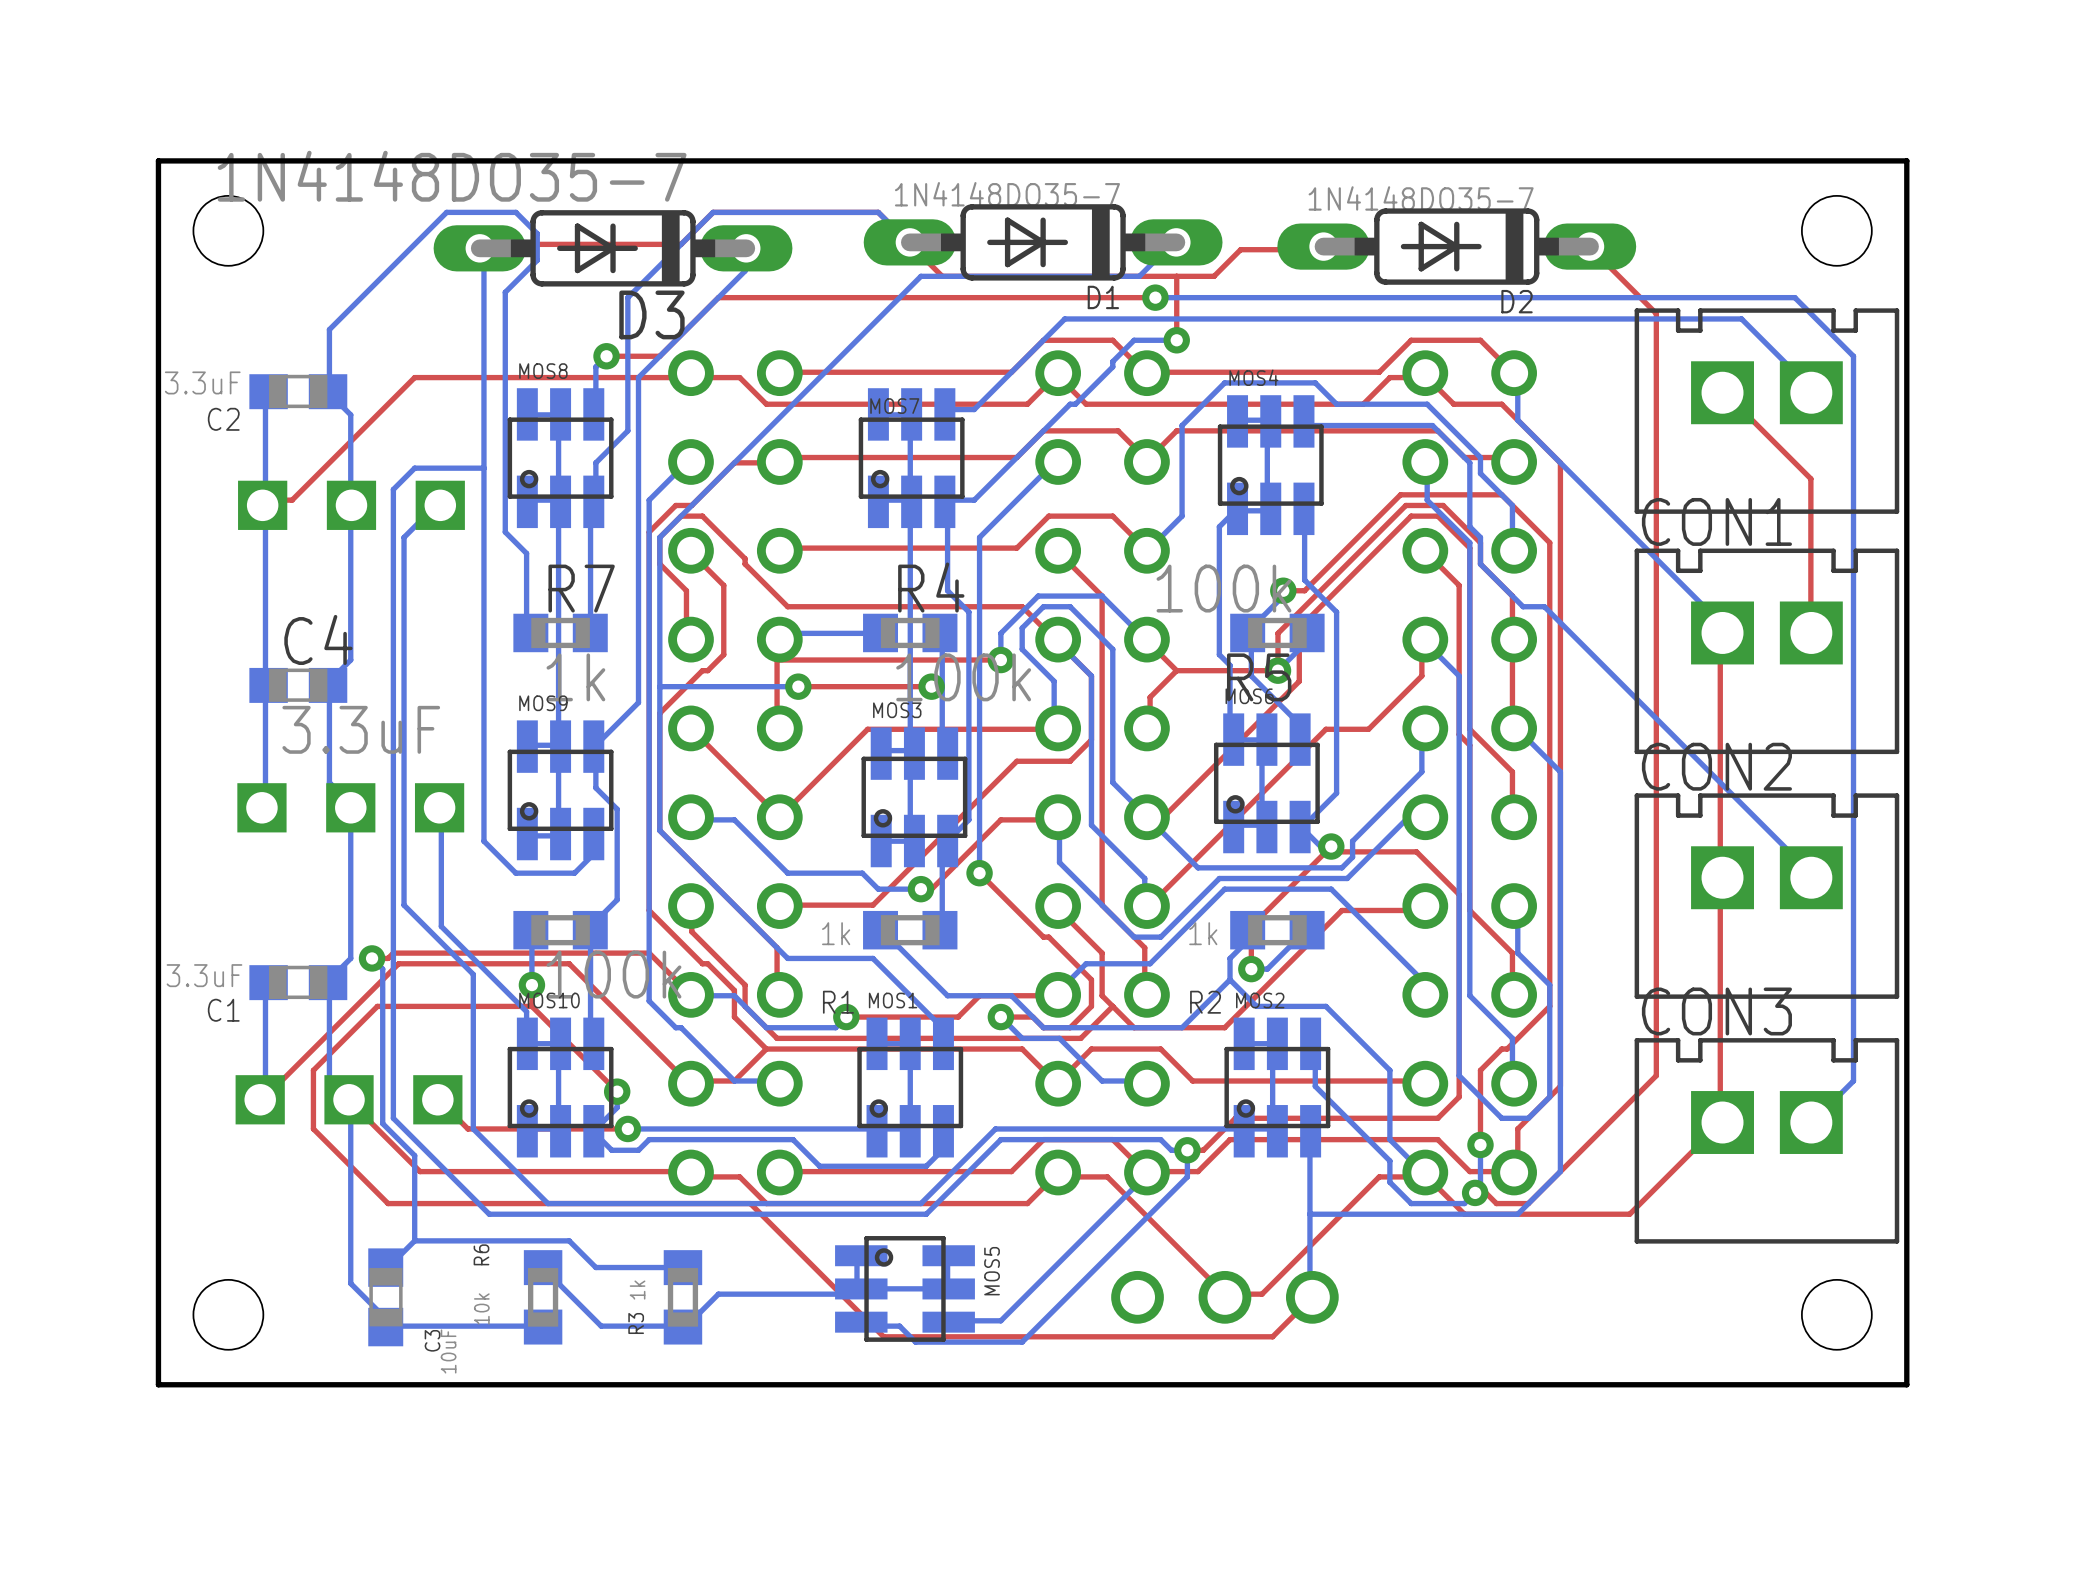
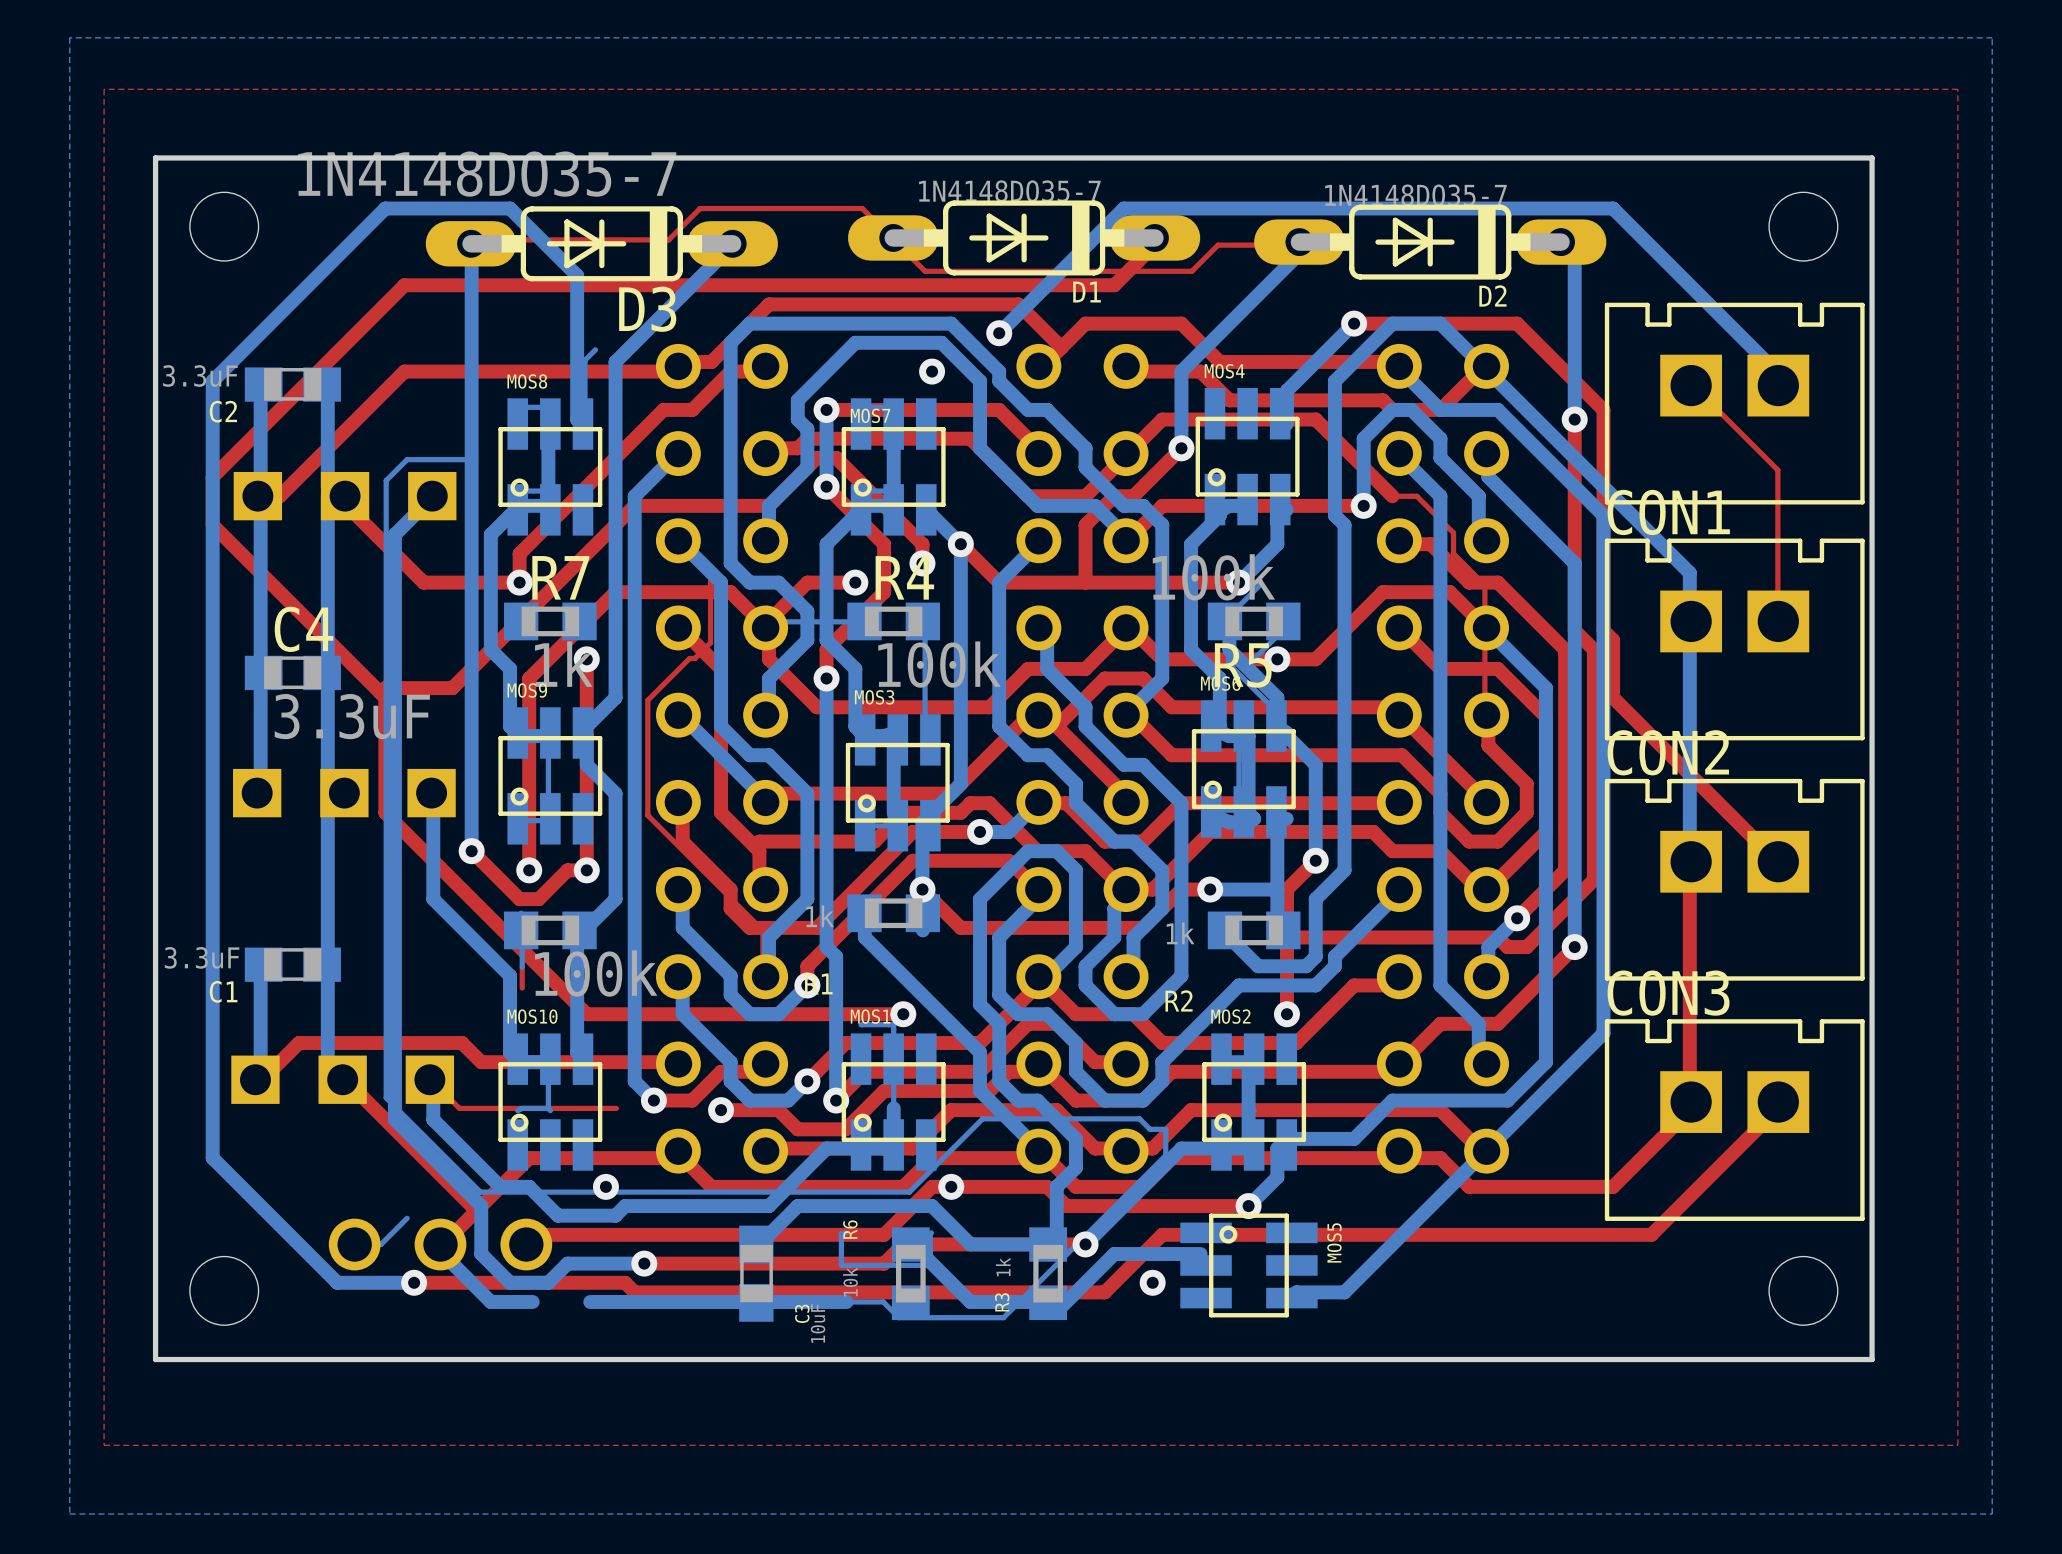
bottom zone outline: none -> (1992, 37) (69, 37) (69, 1514) (1992, 1514) (1992, 37)
top zone outline: none -> (1957, 89) (104, 89) (104, 1445) (1957, 1445) (1957, 89)
bottom track: (446, 212) (329, 329) (328, 391) (350, 414) (351, 505) (350, 660) (329, 681) (328, 685) (329, 782) (350, 803) (350, 958) (328, 982) (329, 1081) (350, 1102) (350, 1283) (382, 1315) (382, 1326) (385, 1327) (499, 1326) -> (438, 208) (385, 208) (212, 381) (212, 1158) (337, 1282) (414, 1282)
bottom track: (515, 212) (537, 233) (537, 260) (505, 292) (505, 532) (526, 553) (526, 628) (530, 632) -> (506, 208) (510, 208) (577, 275) (577, 419) (582, 424)
bottom track width: thin (515, 212) (446, 212) -> thick (506, 208) (438, 208)
bottom track: (909, 242) (878, 212) (713, 212) (627, 297) (627, 430) (595, 462) (595, 500) (590, 505) (590, 632) -> none
bottom track: (1176, 242) (1171, 244) (1139, 276) (920, 276) (659, 537) (659, 830) (787, 958) (872, 958) (942, 1027) (943, 1043) -> none
top track: (1590, 246) (1656, 313) (1656, 1075) (1528, 1203) (1496, 1203) (1485, 1192) (1475, 1192) -> none
bottom track: (479, 248) (483, 249) (483, 841) (515, 873) (574, 873) (590, 857) (590, 835) (593, 834) -> (471, 243) (471, 851)
bottom track: (746, 248) (745, 271) (638, 377) (638, 702) (593, 746) (595, 750) (595, 787) (617, 809) (617, 899) (590, 926) (590, 1043) (593, 1043) -> (732, 243) (615, 361) (615, 697) (586, 726) (582, 733) (586, 736) (586, 764) (615, 793) (615, 899) (586, 927) (579, 930) (577, 937) (577, 1052) (582, 1059)
top track: none -> (1161, 243) (1152, 246) (1114, 285) (404, 285) (212, 477) (212, 525) (385, 697) (385, 812) (586, 1014) (903, 1014)
bottom track: none -> (1312, 243) (1306, 246) (1181, 371) (1181, 448)
bottom track: none -> (1573, 243) (1574, 419)
top track: (1176, 276) (1176, 340) -> none
bottom track: (1155, 297) (1794, 297) (1853, 356) (1853, 1081) (1811, 1122) -> none
top track: (1155, 297) (718, 297) (659, 356) (606, 356) -> none
via: (1155, 297) -> none
bottom track: none -> (1354, 323) (1286, 390) (1286, 424)
top track: none -> (1354, 323) (1517, 323) (1603, 409) (1603, 630) (1613, 640) (1613, 697) (1778, 861)
via: none -> (1354, 323)
via: none -> (999, 333)
bottom track: (1176, 340) (1134, 340) (1112, 361) (1112, 366) (1075, 404) (1070, 404) (974, 500) (947, 500) (944, 501) (947, 505) (947, 590) (968, 612) (968, 819) (947, 841) -> none
via: (1176, 340) -> none
top track: none -> (1061, 347) (1018, 304) (769, 304) (711, 361) (682, 361) (673, 371) (404, 371) (279, 496) (260, 496) (257, 501)
via: (606, 356) -> none
top track: none -> (765, 366) (759, 371) (730, 371) (692, 409) (663, 409) (519, 553) (519, 582) (423, 582) (344, 501)
bottom track: none -> (1399, 366) (1402, 371) (1440, 409) (1497, 409) (1603, 515) (1603, 1033) (1344, 1292) (1296, 1292) (1291, 1298)
top track: none -> (1399, 366) (1392, 361) (1219, 361) (1181, 323) (1085, 323) (1047, 361) (1038, 366)
bottom track: (1514, 373) (1517, 377) (1517, 420) (1725, 628) (1722, 632) -> none
top track: (1514, 373) (1480, 340) (1411, 340) (1379, 372) (1146, 373) (1112, 340) (1043, 340) (1011, 372) (779, 373) -> (1486, 366) (1478, 371) (1440, 409) (1392, 409) (1382, 400) (1229, 400) (1200, 371) (1133, 371) (1126, 366)
via: none -> (932, 371)
bottom track: none -> (322, 384) (327, 390) (327, 486) (344, 501) (327, 496) (327, 668) (322, 672) (327, 678) (327, 774) (344, 793) (327, 784) (327, 956) (322, 964) (327, 966) (327, 1071) (337, 1081) (344, 1084)
bottom track: (1811, 392) (1810, 388) (1741, 318) (1064, 318) (974, 409) (947, 409) (944, 414) -> (1778, 385) (1785, 381) (1613, 208) (1123, 208) (999, 333)
bottom track width: thin (265, 398) (265, 500) -> thick (260, 390) (260, 491)
bottom track: none -> (826, 409) (826, 486)
top track: none -> (826, 409) (999, 409) (1037, 448) (1038, 453)
via: none -> (826, 409)
bottom track: (1237, 421) (1270, 421) (1267, 425) (1267, 505) (1270, 508) (1267, 510) (1240, 510) (1237, 508) (1219, 526) (1219, 654) (1230, 665) (1230, 734) (1235, 739) (1266, 739) -> none
bottom track: (1303, 421) (1304, 425) (1432, 425) (1469, 462) (1469, 526) (1480, 537) (1480, 564) (1523, 606) (1544, 606) (1810, 873) (1811, 877) -> none
top track: none -> (1574, 419) (1574, 630) (1593, 649) (1593, 879) (1526, 947) (1507, 947) (1497, 937) (1286, 937)
via: none -> (1574, 419)
bottom track width: thin (558, 437) (558, 500) -> thick (548, 429) (548, 491)
bottom track width: thin (910, 437) (910, 500) -> thick (893, 429) (893, 491)
top track: none -> (1181, 448) (1133, 496) (1114, 496) (1085, 525) (1085, 582)
via: none -> (1181, 448)
MOS8 position: (560, 458) -> (550, 466)
MOS7 position: (911, 458) -> (893, 466)
bottom track: (691, 461) (686, 462) (649, 500) (649, 1001) (675, 1027) (681, 1027) (734, 1081) (777, 1081) (779, 1083) -> (678, 453) (634, 496) (634, 1081) (653, 1100)
top track: none -> (765, 453) (769, 448) (797, 448) (807, 438) (970, 438) (1027, 496) (1085, 496) (1126, 453) (1162, 419) (1315, 419) (1392, 496)
bottom track: (1058, 461) (1054, 462) (979, 537) (979, 873) -> none
bottom track: (1425, 461) (1427, 462) (1427, 500) (1469, 542) (1469, 995) (1512, 1038) (1512, 1081) (1514, 1083) -> (1399, 453) (1440, 496) (1440, 985) (1478, 1023) (1478, 1062) (1486, 1063)
bottom track: none -> (1486, 453) (1488, 457) (1488, 477) (1574, 563) (1574, 947)
top track: (1514, 461) (1512, 457) (1464, 457) (1437, 430) (1176, 430) (1146, 461) (1118, 430) (1043, 430) (1016, 457) (782, 457) (777, 462) (734, 462) (691, 505) (675, 505) (649, 532) (649, 910) (702, 963) (707, 963) (734, 990) (734, 1017) (766, 1049) -> none
top track: none -> (826, 486) (884, 544) (884, 592) (826, 649) (826, 678)
via: none -> (826, 486)
top track: (262, 505) (265, 500) (292, 500) (414, 377) (686, 377) (691, 373) (691, 377) (739, 377) (766, 404) (1027, 404) (1058, 373) (1059, 377) (1086, 404) (1363, 404) (1389, 377) (1421, 377) (1425, 373) (1427, 377) (1453, 404) (1501, 404) (1560, 462) (1560, 1086) (1517, 1128) (1517, 1171) (1469, 1171) (1437, 1139) (1230, 1139) (1198, 1171) (1146, 1172) (1112, 1139) (1043, 1139) (1011, 1171) (779, 1172) -> (1486, 1151) (1478, 1148) (1440, 1110) (1191, 1110) (1152, 1148) (1133, 1148) (1126, 1151) (1123, 1148) (1095, 1148) (1056, 1110) (951, 1110) (912, 1148) (769, 1148) (765, 1151)
bottom track: (440, 505) (436, 505) (404, 537) (404, 905) (473, 974) (473, 1128) (547, 1203) (920, 1203) (995, 1128) (1240, 1128) (1244, 1131) (1246, 1128) (1272, 1128) (1272, 1049) (1277, 1043) (1244, 1043) -> none
top track: (1418, 505) (1405, 505) (1277, 633) (1277, 670) (1176, 670) (1150, 697) (1150, 723) (1146, 728) -> (1486, 715) (1488, 716) (1488, 745) (1526, 784) (1526, 812) (1497, 841) (1469, 841) (1440, 812) (1440, 793) (1402, 755) (1171, 755) (1133, 716) (1126, 715)
bottom track: (1303, 508) (1304, 580) (1336, 612) (1336, 793) (1304, 825) (1300, 827) (1320, 846) (1331, 846) -> none
bottom track: none -> (431, 501) (423, 505) (394, 534) (394, 1119) (481, 1206) (481, 1254) (510, 1282) (548, 1282) (567, 1263) (644, 1263)
bottom track width: thin (265, 515) (265, 681) (268, 685) -> thick (260, 505) (260, 668) (263, 672)
bottom track: (558, 515) (558, 745) -> none
bottom track: (910, 515) (910, 749) -> (893, 505) (893, 509) (884, 505) (864, 505) (826, 544) (826, 640) (855, 668) (855, 726) (864, 736) (884, 736) (893, 733) (893, 736)
bottom track: none -> (1248, 505) (1229, 505) (1221, 509) (1219, 515) (1191, 544) (1191, 649) (1219, 678) (1221, 733) (1229, 736) (1248, 736) (1248, 812) (1254, 818) (1248, 822) (1229, 822) (1221, 818)
via: none -> (1363, 505)
bottom track: none -> (550, 509) (548, 505) (519, 505) (517, 509) (490, 534) (490, 649) (510, 668) (510, 726) (519, 736) (548, 736)
bottom track: none -> (926, 509) (960, 544) (960, 784) (922, 822) (922, 930)
bottom track: none -> (1286, 509) (1277, 515) (1277, 544) (1239, 582)
bottom track: none -> (678, 540) (721, 582) (721, 726) (749, 755) (769, 755) (807, 793) (807, 899) (769, 937) (769, 975) (765, 976)
bottom track: none -> (1038, 540) (999, 582) (999, 726) (1027, 755) (1047, 755) (1075, 784) (1075, 803) (1114, 841) (1133, 841) (1162, 870) (1162, 908) (1133, 937) (1133, 975) (1126, 976)
top track: (1058, 550) (1102, 596) (1102, 905) (1144, 947) (1144, 990) (1146, 994) -> none
bottom track: none -> (1126, 540) (1123, 534) (1095, 505) (1037, 505) (980, 448) (980, 381) (941, 342) (855, 342) (797, 400) (797, 419) (807, 429) (807, 467) (769, 505) (769, 534) (765, 540)
top track: (1146, 550) (1112, 516) (1048, 516) (1016, 548) (782, 548) (779, 550) -> (1126, 540) (1162, 505) (1363, 505)
top track: (1425, 550) (1459, 585) (1459, 734) (1469, 745) (1469, 910) (1512, 953) (1514, 994) -> (1399, 540) (1402, 544) (1430, 544) (1469, 582) (1497, 582) (1565, 649) (1565, 870) (1517, 918)
bottom track: (1514, 550) (1512, 548) (1512, 505) (1480, 473) (1480, 457) (1427, 404) (1336, 404) (1315, 382) (1224, 382) (1182, 425) (1182, 516) (1146, 550) -> (1486, 540) (1478, 534) (1478, 496) (1440, 457) (1440, 438) (1411, 409) (1392, 409) (1363, 438) (1363, 505)
top track: none -> (960, 544) (999, 582) (1239, 582)
via: none -> (960, 544)
top track: none -> (922, 563) (922, 544) (836, 457) (816, 457) (769, 505) (634, 505) (452, 688) (385, 688) (380, 692)
via: none -> (922, 563)
top track: (1283, 590) (1304, 590) (1400, 494) (1501, 494) (1549, 542) (1549, 1006) (1507, 1049) (1501, 1049) (1480, 1070) (1480, 1144) -> none
via position: (1283, 590) -> (1239, 582)
via: none -> (519, 582)
top track: none -> (855, 582) (807, 582) (769, 620) (765, 627)
via: none -> (855, 582)
bottom track: none -> (1224, 621) (1229, 630) (1229, 649) (1277, 697) (1277, 726) (1286, 733) (1286, 736) (1315, 764) (1315, 860)
top track: (1722, 632) (1720, 633) (1720, 873) (1722, 877) (1720, 878) (1720, 1118) (1722, 1122) (1629, 1214) (1464, 1214) (1427, 1176) (1425, 1172) (1421, 1176) (1379, 1176) (1261, 1294) (1230, 1294) (1224, 1297) (1224, 1294) (1107, 1176) (1059, 1176) (1058, 1172) (1027, 1203) (766, 1203) (739, 1176) (691, 1176) (691, 1172) (686, 1171) (420, 1171) (349, 1099) -> none
top track: (691, 639) (686, 638) (686, 590) (659, 564) (659, 537) (681, 516) (702, 516) (745, 558) (745, 564) (787, 606) (1022, 606) (1054, 638) (1058, 639) (1059, 644) (1091, 676) (1091, 739) (1070, 761) (1016, 761) (872, 905) (779, 906) -> (678, 627) (721, 668) (721, 812) (759, 851) (759, 889) (765, 889)
top track: none -> (765, 627) (730, 592) (615, 592) (529, 678) (529, 870)
bottom track: (1058, 639) (1059, 644) (1091, 676) (1091, 825) (1144, 878) (1144, 905) (1146, 906) -> (1038, 627) (1047, 630) (1047, 668) (1085, 707) (1085, 726) (1123, 764) (1143, 764) (1181, 803) (1181, 975) (1143, 1014) (1114, 1014) (1085, 985) (1085, 966) (1114, 937) (1114, 908) (1123, 899) (1126, 889)
bottom track: (1146, 639) (1102, 596) (1038, 596) (1000, 633) (1000, 660) -> none
bottom track: (1425, 639) (1427, 644) (1459, 676) (1459, 1075) (1501, 1118) (1528, 1118) (1549, 1096) (1549, 985) (1517, 953) (1517, 910) (1514, 906) -> none
top track: (1425, 639) (1421, 644) (1421, 676) (1368, 729) (1325, 729) (1150, 905) (1146, 906) -> (1399, 627) (1440, 668) (1497, 668) (1545, 716) (1545, 831) (1488, 889) (1478, 889) (1440, 851) (1392, 851) (1373, 831) (1210, 831) (1152, 889) (1123, 889) (1085, 851) (1037, 851) (989, 803) (970, 803) (960, 812) (903, 812) (874, 841) (759, 841) (754, 846)
bottom track: none -> (1486, 627) (1545, 688) (1545, 1062) (1507, 1100) (1392, 1100) (1354, 1138) (1286, 1138) (1286, 1144) (1277, 1148) (1277, 1177) (1248, 1206)
top track: none -> (1486, 627) (1450, 592) (1382, 592) (1315, 659) (1162, 659) (1133, 630) (1126, 627) (1085, 668) (1027, 668) (989, 707) (816, 707) (769, 659) (769, 630) (765, 627)
top track: (1000, 660) (777, 660) (779, 639) (777, 644) (777, 723) -> none
via: (1000, 660) -> none
via position: (1277, 670) -> (1277, 659)
top track: none -> (586, 659) (586, 870) (567, 870) (538, 899) (519, 899) (471, 851)
via: none -> (586, 659)
bottom track: (798, 686) (659, 686) -> none
via position: (798, 686) -> (826, 678)
top track: (931, 686) (798, 686) -> none
via: (931, 686) -> none
bottom track width: thin (265, 691) (265, 798) -> thick (260, 678) (260, 784)
bottom track: none -> (826, 678) (826, 947) (836, 956) (836, 1100)
bottom track: none -> (678, 715) (682, 716) (759, 793) (765, 802)
top track: (1058, 728) (867, 729) (779, 817) (691, 728) -> (1038, 715) (1037, 707) (951, 793) (769, 793) (765, 802)
top track: none -> (1038, 715) (1047, 716) (1123, 793) (1126, 802)
bottom track: none -> (1126, 715) (1162, 678) (1162, 525) (1143, 505) (1123, 505) (1085, 467) (1085, 448) (1047, 409) (1027, 409) (999, 381) (999, 371) (951, 323) (749, 323) (730, 342) (730, 563) (749, 582) (778, 582) (807, 611) (807, 640) (769, 678) (769, 707) (765, 715)
bottom track: (1425, 728) (1421, 729) (1421, 771) (1352, 841) (1352, 857) (1341, 867) (1198, 867) (1112, 782) (1112, 649) (1070, 606) (1043, 606) (1022, 628) (1022, 649) (1054, 681) (1054, 723) (1058, 728) -> none
bottom track: (1514, 728) (1517, 729) (1560, 771) (1560, 1171) (1517, 1214) (1309, 1214) -> none
bottom track width: thin (910, 755) (910, 827) -> thick (893, 742) (893, 812)
bottom track width: thin (441, 809) (441, 915) -> thick (433, 794) (433, 899)
bottom track: (691, 817) (691, 819) (734, 819) (787, 873) (862, 873) (878, 889) (920, 889) -> none
top track: none -> (678, 802) (682, 803) (682, 841) (730, 889) (730, 908) (749, 927) (816, 927) (912, 831) (980, 831)
top track: (1058, 817) (1054, 819) (1000, 819) (931, 889) (920, 889) -> (1038, 802) (1066, 803) (1104, 841) (1143, 841) (1181, 803) (1399, 802)
bottom track: (1425, 817) (1421, 819) (1405, 819) (1347, 878) (1219, 878) (1160, 937) (1134, 937) (1059, 862) (1058, 817) -> (980, 831) (1008, 831) (1038, 802)
top track: (1514, 817) (1512, 814) (1512, 771) (1469, 729) (1469, 548) (1437, 516) (1411, 516) (1299, 628) (1299, 681) (1166, 814) (1150, 814) (1146, 817) -> (1486, 802) (1392, 707) (1171, 707) (1143, 678) (1104, 678) (1056, 726) (1038, 715)
bottom track: none -> (1286, 818) (1277, 822) (1277, 927) (1283, 930)
bottom track: (947, 841) (942, 846) (942, 926) (939, 930) -> none
top track: (1331, 846) (1251, 926) (1251, 969) -> none
via position: (1331, 846) -> (1315, 860)
top track: (1325, 851) (1416, 851) (1459, 894) (1459, 1096) (1437, 1118) (1235, 1118) (1203, 1150) (1187, 1150) -> none
via: none -> (471, 851)
top track: (979, 873) (1043, 937) (1048, 937) (1091, 979) (1091, 1006) (1070, 1027) (1043, 1027) (1032, 1017) (1000, 1017) -> none
via position: (979, 873) -> (980, 831)
top track: none -> (1315, 860) (1286, 889) (1286, 1014)
bottom track: none -> (1691, 861) (1689, 573) (1488, 371) (1486, 366) (1478, 361) (1440, 323) (1392, 323) (1334, 381) (1334, 515) (1344, 525) (1344, 870) (1315, 899) (1315, 956) (1306, 966) (1258, 966) (1229, 937) (1224, 930)
top track: none -> (1691, 861) (1689, 1110) (1613, 1186) (1469, 1186) (1440, 1158) (1402, 1158) (1399, 1151) (1392, 1158) (1171, 1158) (1143, 1186) (1075, 1186) (1038, 1151) (1037, 1158) (932, 1158) (903, 1186) (711, 1186) (682, 1158) (678, 1151) (673, 1158) (529, 1158) (442, 1244) (440, 1244)
via: none -> (529, 870)
via: none -> (586, 870)
via position: (920, 889) -> (922, 889)
bottom track: none -> (678, 889) (682, 899) (682, 927) (730, 975) (730, 995) (749, 1014) (778, 1014) (807, 985)
top track: (691, 906) (691, 931) (745, 985) (745, 1006) (777, 1038) (1080, 1038) (1112, 1006) -> none
top track: none -> (1210, 889) (1181, 889) (1143, 927) (960, 927) (922, 889)
via: none -> (1210, 889)
bottom track: none -> (1277, 889) (1210, 889)
bottom track: none -> (1399, 889) (1392, 899) (1334, 956) (1334, 966) (1315, 985) (1239, 985) (1162, 1062) (1162, 1081) (1143, 1100) (1104, 1100) (1075, 1071) (1075, 1043) (1047, 1014) (1018, 1014) (999, 995) (999, 937) (1037, 899) (1038, 889)
top track: (1425, 906) (1421, 910) (1341, 910) (1224, 1027) (1134, 1027) (1102, 995) (1102, 953) (1059, 910) (1058, 906) -> (807, 985) (807, 966) (912, 860) (1008, 860) (1038, 889)
bottom track: (441, 915) (441, 926) (526, 1011) (526, 1043) (560, 1043) (558, 1049) (558, 1081) -> (433, 899) (510, 975) (510, 1052) (519, 1062) (548, 1062) (550, 1059)
part position: (560, 930) -> (550, 930)
bottom track: (880, 930) (947, 995) (1011, 995) (1043, 1027) (1182, 1027) (1230, 979) -> none
bottom track: (1247, 930) (1246, 942) (1230, 958) (1230, 979) -> none
R2 position: (1277, 930) -> (1254, 930)
bottom track: (1307, 930) (1267, 969) (1251, 969) -> none
bottom track: none -> (1517, 918) (1488, 947) (1488, 975) (1486, 976)
via: none -> (1517, 918)
bottom track: none -> (864, 930) (864, 937) (980, 1052) (980, 1090) (1038, 1151)
bottom track: (372, 958) (382, 969) (382, 1123) (414, 1155) (414, 1240) (569, 1240) (595, 1267) (682, 1267) -> none
top track: (372, 958) (388, 958) (393, 953) (649, 953) (691, 994) -> none
via: (372, 958) -> none
top track: none -> (1574, 947) (1497, 1023) (1440, 1023) (1392, 1071) (1171, 1071) (1143, 1100) (1075, 1100) (1038, 1063) (1037, 1071) (1008, 1071) (989, 1090) (884, 1090) (845, 1129) (797, 1129) (778, 1110) (721, 1110)
via: none -> (1574, 947)
via: (1251, 969) -> none
bottom track: (1230, 979) (1256, 1006) (1325, 1006) (1389, 1070) (1389, 1139) (1421, 1171) (1425, 1172) -> none
bottom track width: thin (265, 985) (265, 1096) -> thick (260, 967) (260, 1077)
via: (531, 985) -> none
bottom track: (691, 994) (734, 995) (766, 1027) (835, 1027) (846, 1017) -> (678, 976) (682, 985) (682, 1014) (730, 1062) (730, 1081) (749, 1100) (788, 1100) (807, 1081)
top track: (1058, 994) (979, 995) (958, 1017) (846, 1017) -> none
bottom track: (1425, 994) (1421, 990) (1421, 979) (1331, 889) (1224, 889) (1150, 963) (1086, 963) (1059, 990) (1058, 994) -> (756, 1244) (759, 1244) (797, 1206) (932, 1206) (970, 1244) (1056, 1244) (1056, 1186) (1075, 1167) (1075, 1138) (1037, 1100) (1018, 1100) (999, 1081) (999, 1023) (980, 1004) (980, 899) (1027, 851) (1056, 851) (1075, 870) (1075, 947) (1047, 975) (1038, 976)
top track: none -> (1399, 976) (1392, 985) (1354, 985) (1296, 1043) (1162, 1043) (1133, 1014) (1075, 1014) (1038, 976) (1037, 985) (980, 1043) (845, 1043) (807, 1081)
via position: (846, 1017) -> (807, 985)
bottom track: (1000, 1017) (1022, 1038) (1059, 1038) (1102, 1081) (1144, 1081) (1146, 1083) -> none
via: (1000, 1017) -> none
via: none -> (903, 1014)
via: none -> (1286, 1014)
bottom track: (1310, 1043) (1315, 1049) (1315, 1086) (1389, 1160) (1389, 1182) (1411, 1203) (1464, 1203) (1480, 1187) (1480, 1144) -> none
top track: (766, 1049) (1022, 1049) (1058, 1083) (1091, 1049) (1160, 1049) (1192, 1081) (1421, 1081) (1425, 1083) -> none
top track: (766, 1049) (734, 1081) (691, 1081) (691, 1083) (569, 963) (398, 963) (265, 1096) (260, 1099) -> none
bottom track: none -> (1221, 1059) (1229, 1062) (1248, 1062) (1248, 1138) (1254, 1144) (1248, 1148) (1229, 1148) (1221, 1144) (1219, 1148) (1181, 1148) (1085, 1244)
top track: none -> (678, 1063) (673, 1062) (481, 1062) (462, 1043) (299, 1043) (257, 1084)
top track: none -> (765, 1063) (759, 1071) (721, 1071) (692, 1100) (653, 1100)
top track: none -> (1126, 1063) (1123, 1062) (1095, 1062) (1056, 1023) (1027, 1023) (980, 1071) (864, 1071) (836, 1100)
MOS10 position: (560, 1087) -> (550, 1102)
MOS1 position: (910, 1087) -> (893, 1102)
MOS2 position: (1277, 1087) -> (1254, 1102)
bottom track: (617, 1091) (617, 1107) (593, 1131) (611, 1150) (638, 1150) (649, 1139) (793, 1139) (819, 1166) (926, 1166) (942, 1150) (943, 1131) -> none
top track: (617, 1091) (531, 1006) (377, 1006) (313, 1070) (313, 1128) (388, 1203) (750, 1203) (883, 1336) (1272, 1336) (1312, 1297) -> none
via: (617, 1091) -> none
via: none -> (807, 1081)
top track: none -> (344, 1084) (346, 1081) (476, 1210)
via: none -> (653, 1100)
via: none -> (836, 1100)
top track: none -> (1778, 1102) (1776, 1110) (1651, 1234) (1162, 1234) (1104, 1292) (634, 1292) (625, 1282) (414, 1282)
via: (627, 1128) -> none
bottom track: (910, 1128) (910, 1131) (904, 1128) (878, 1128) (877, 1131) (872, 1128) (627, 1128) -> (893, 1108) (893, 1144) (884, 1148) (864, 1148) (861, 1144) (855, 1148) (826, 1148) (769, 1206) (625, 1206) (615, 1215) (557, 1215) (529, 1186) (500, 1186) (433, 1119) (431, 1084)
via: none -> (721, 1110)
bottom track: (1310, 1131) (1309, 1294) (1312, 1297) -> none
via: (1480, 1144) -> none
via: (1187, 1150) -> none
bottom track: (1146, 1172) (1144, 1176) (1000, 1320) (948, 1322) -> none
via: (1475, 1192) -> none
via: none -> (605, 1186)
via: none -> (951, 1186)
top track: none -> (1248, 1206) (1066, 1206) (1047, 1186) (932, 1186) (884, 1234) (538, 1234) (529, 1244) (526, 1244)
via: none -> (1248, 1206)
bottom track: none -> (440, 1244) (442, 1254) (490, 1301)
bottom track: (543, 1267) (601, 1326) -> none
bottom track: none -> (910, 1244) (970, 1301) (1047, 1301) (1056, 1311) (1114, 1254) (1200, 1254)
top track: none -> (1085, 1244) (903, 1244) (884, 1263) (644, 1263)
via: none -> (1085, 1244)
via: none -> (644, 1263)
bottom track: (861, 1288) (856, 1294) (718, 1294) (686, 1326) (681, 1326) -> (846, 1301) (668, 1301)
MOS5 position: (904, 1288) -> (1248, 1265)
C3 position: (385, 1297) -> (756, 1273)
R6 position: (543, 1297) -> (910, 1273)
R3 position: (682, 1297) -> (1048, 1273)
part position: (1224, 1297) -> (440, 1244)
via: none -> (414, 1282)
via: none -> (1152, 1282)
bottom track width: thin (542, 1326) (499, 1326) -> thick (532, 1301) (490, 1301)
bottom track width: thin (681, 1326) (601, 1326) -> thick (668, 1301) (590, 1301)

